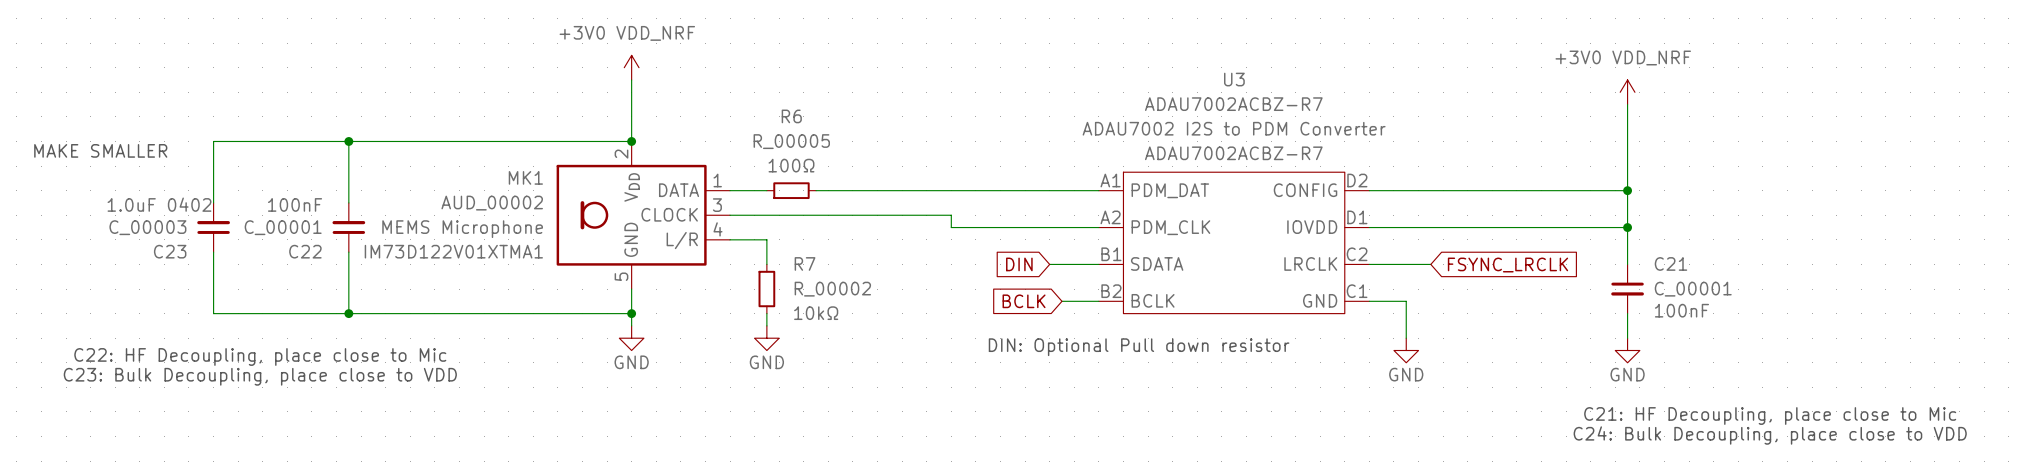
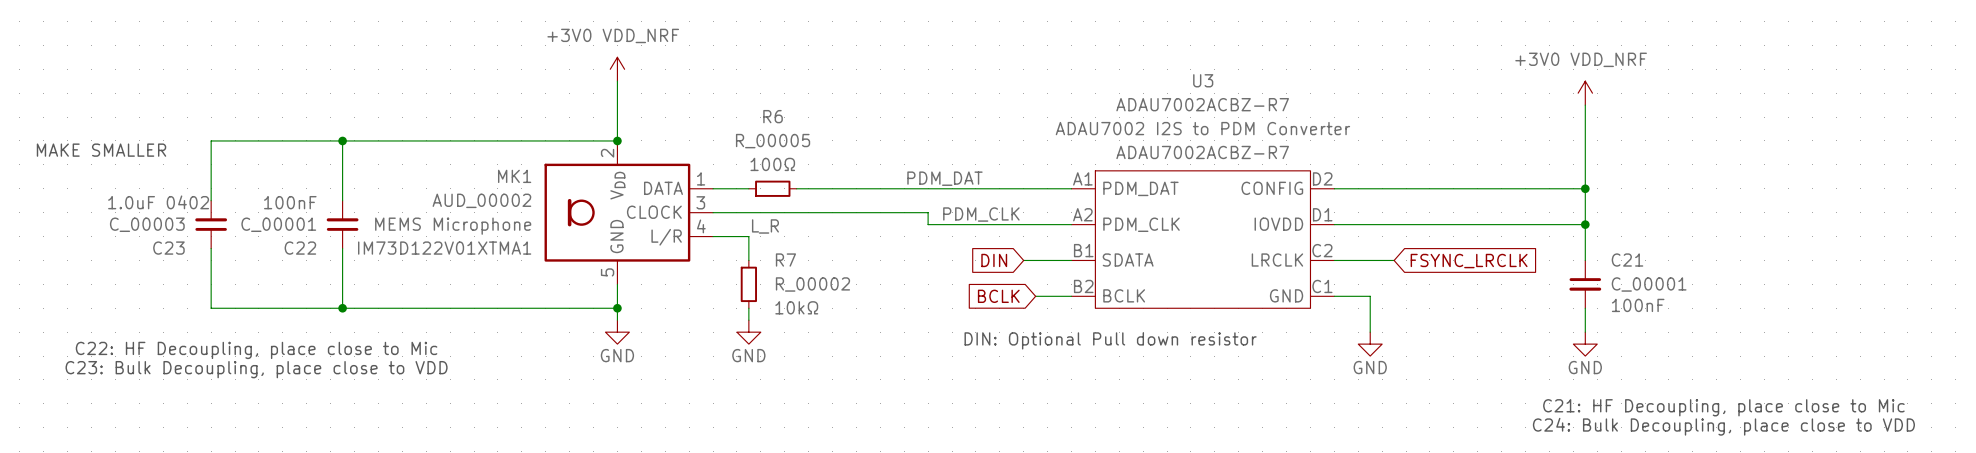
label: none -> PDM_DAT (944, 178)
label: none -> PDM_CLK (981, 214)
label: none -> L_R (765, 226)

